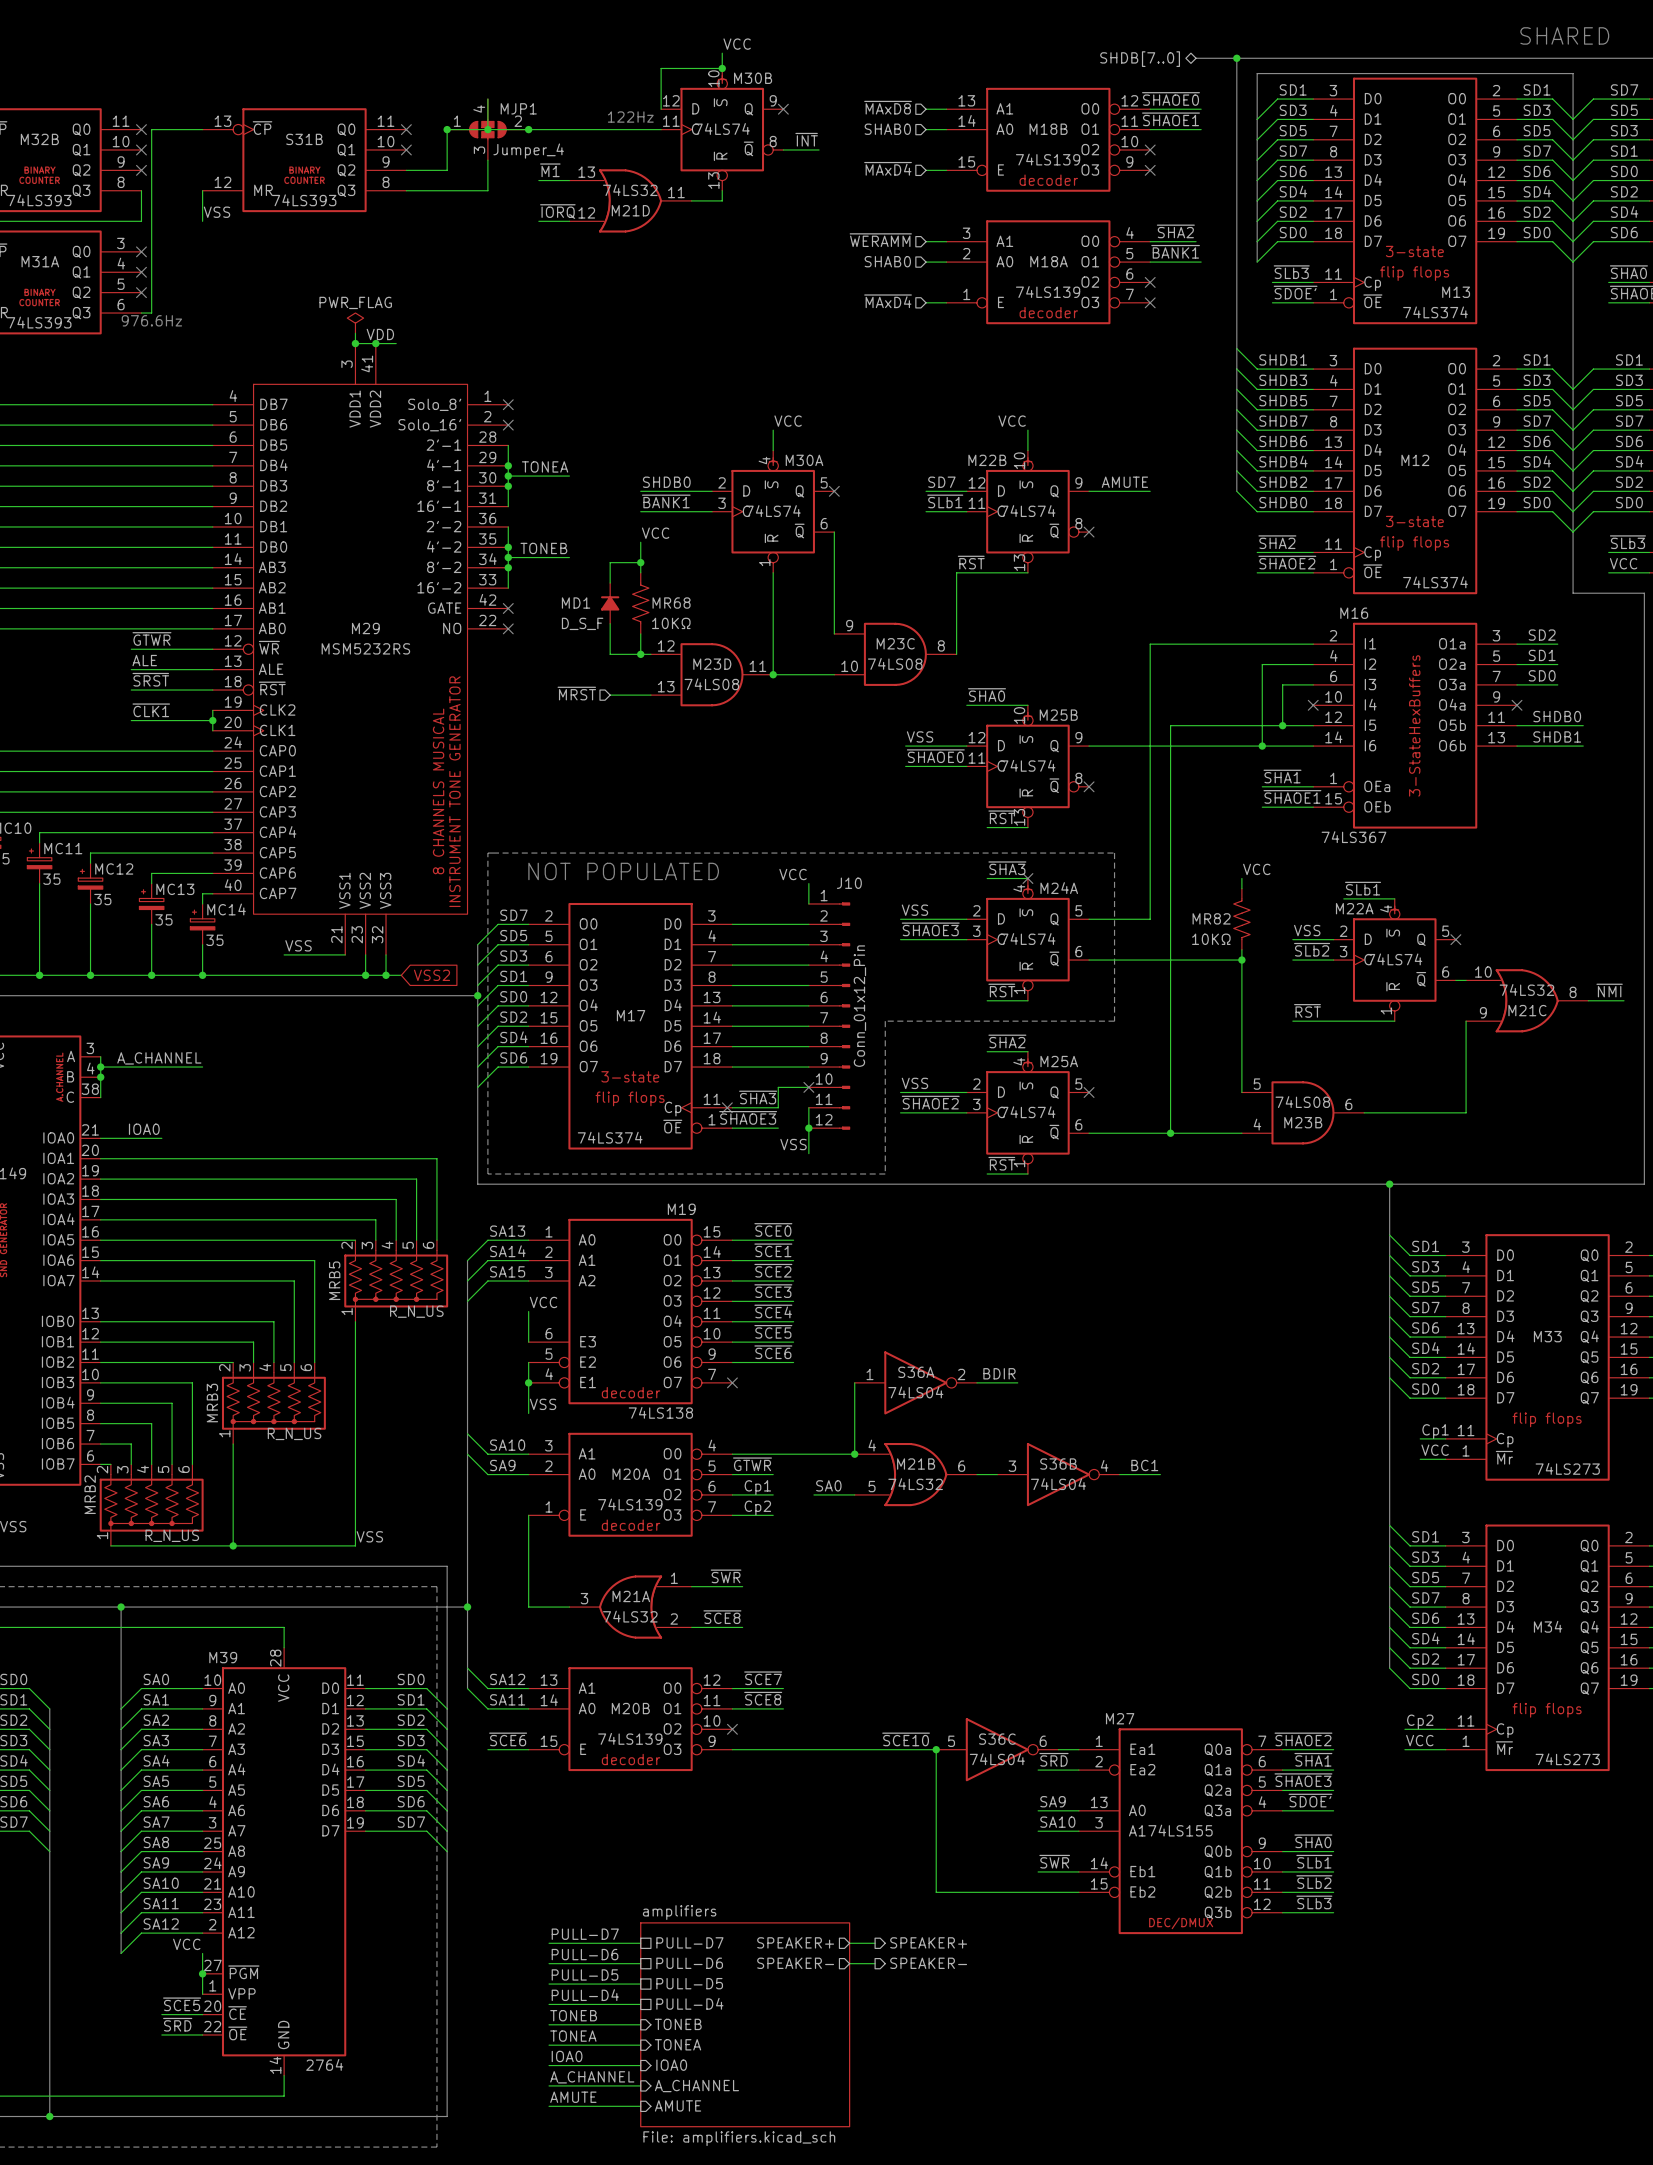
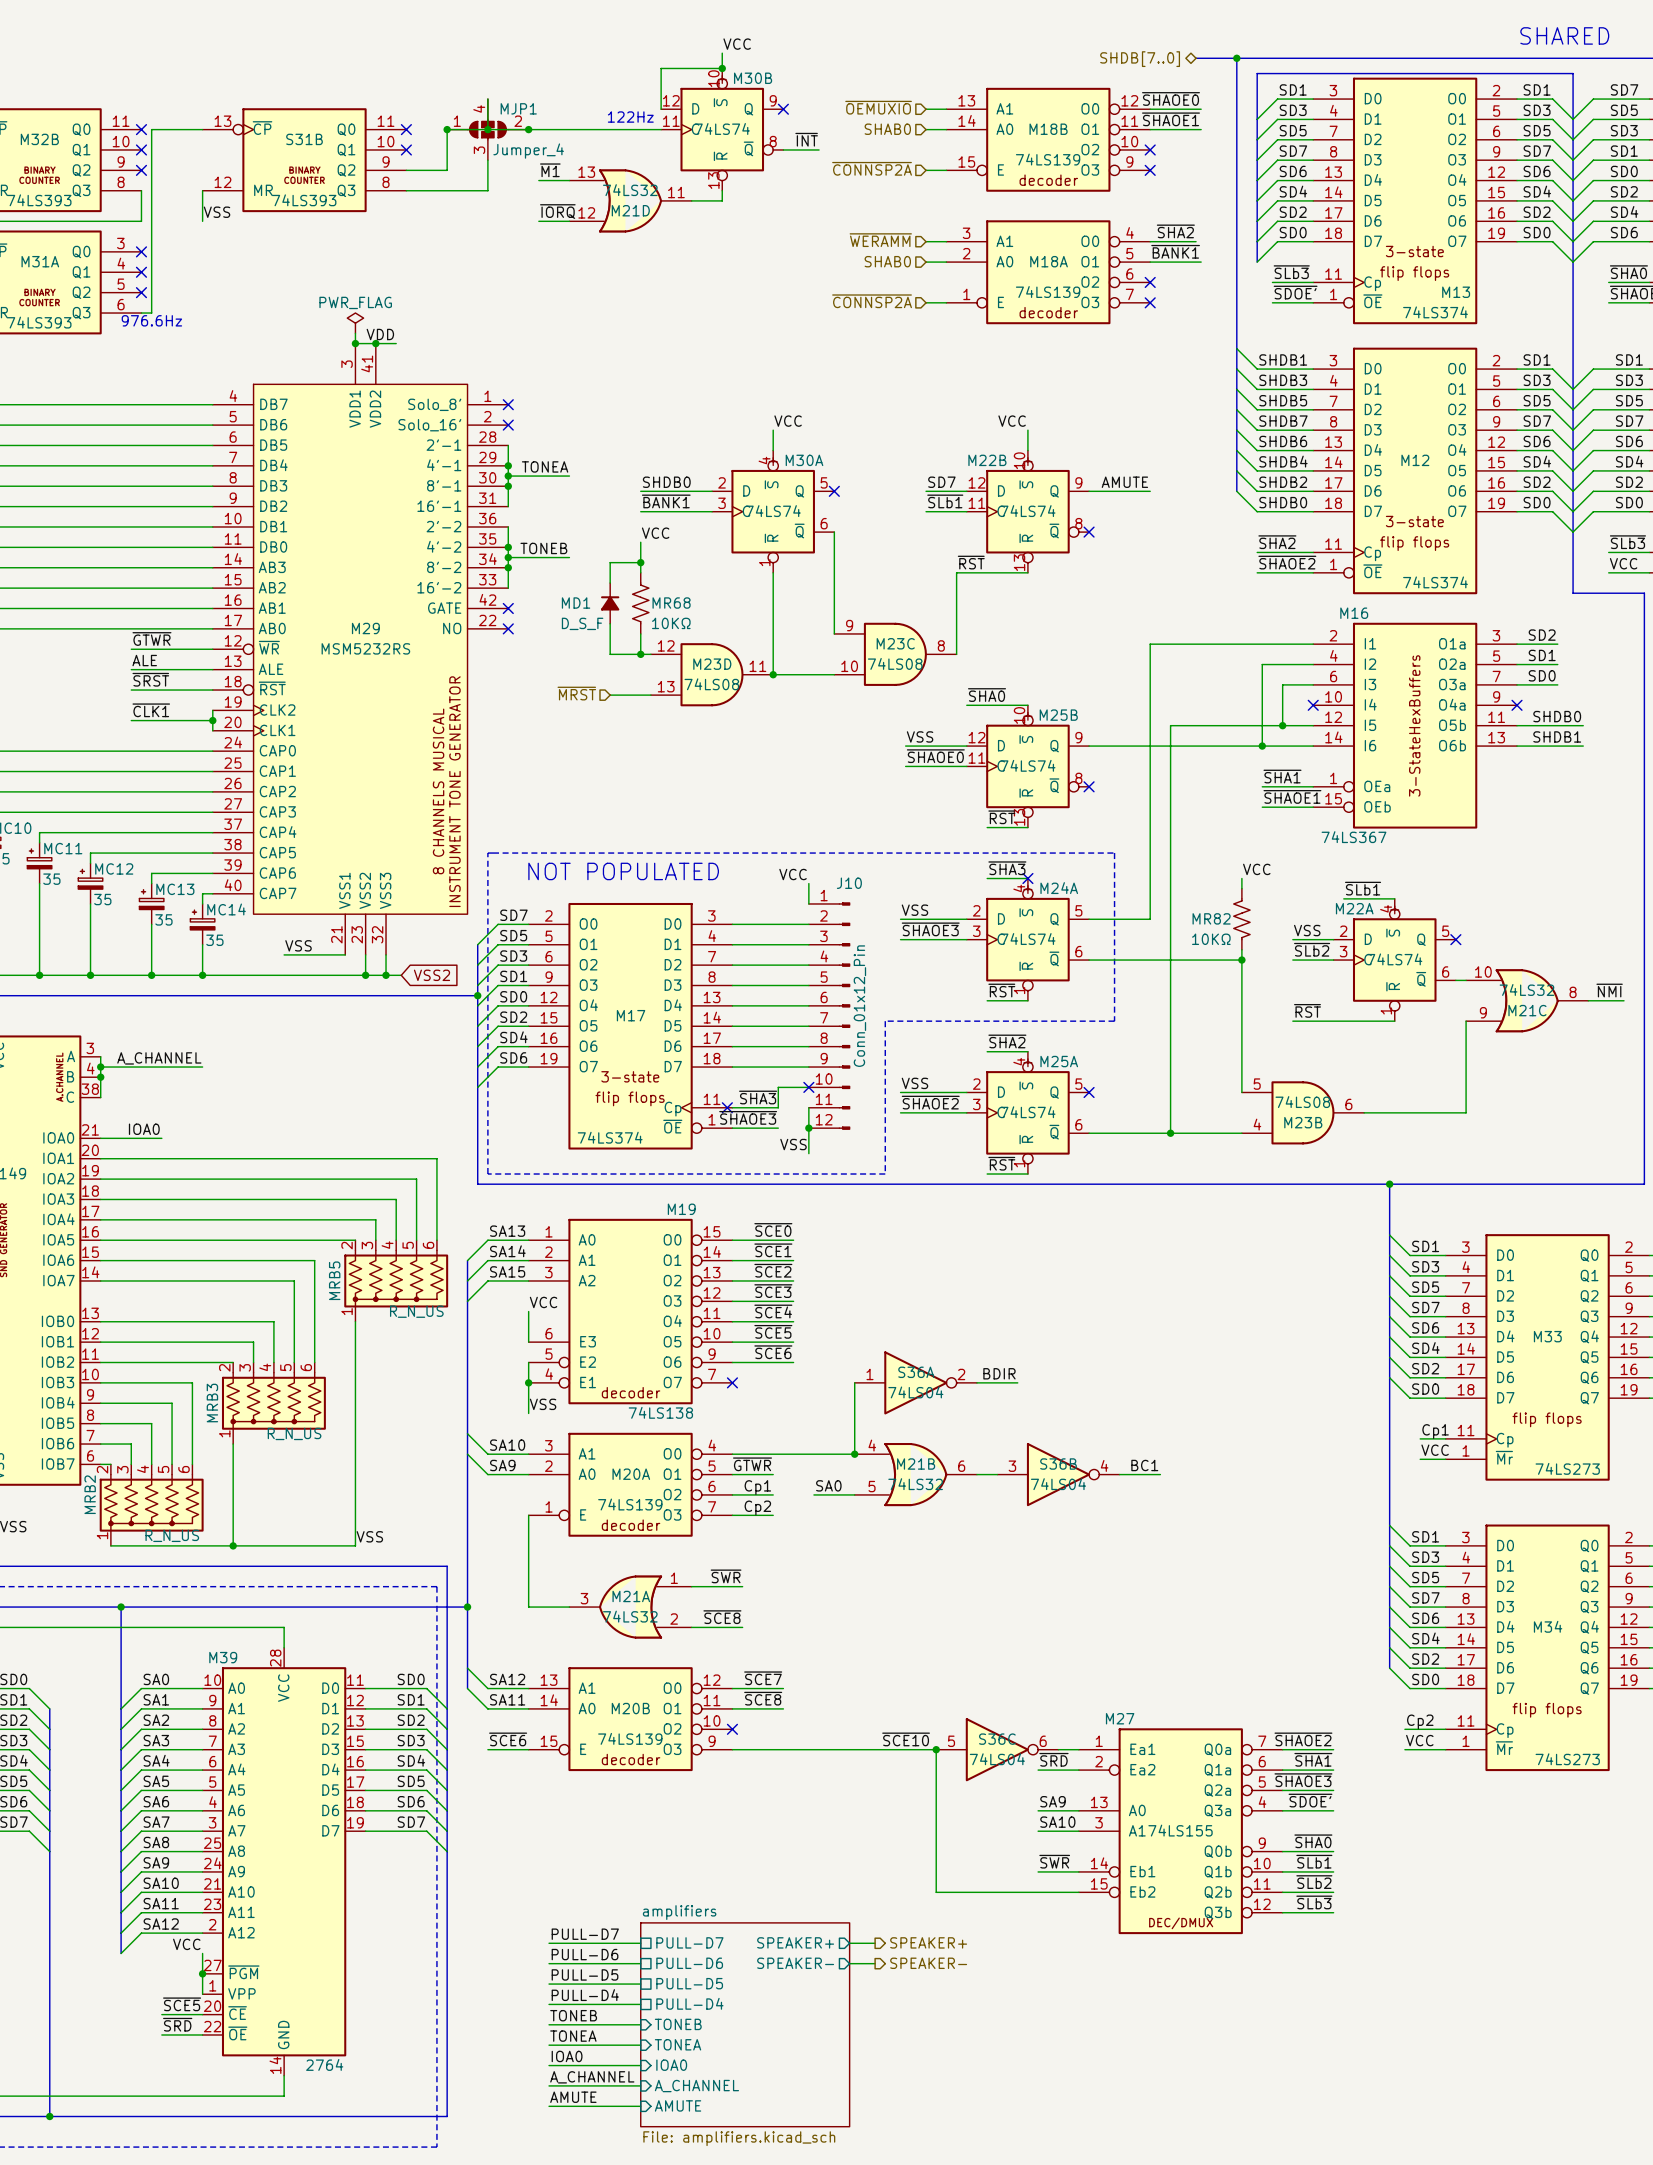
hierarchical label: ~{MAxD8} (888, 107) -> ~{OEMUXIO} (878, 107)
hierarchical label: ~{MAxD4} (888, 168) -> ~{CONNSP2A} (872, 168)
hierarchical label: ~{MAxD4} (888, 301) -> ~{CONNSP2A} (872, 301)

